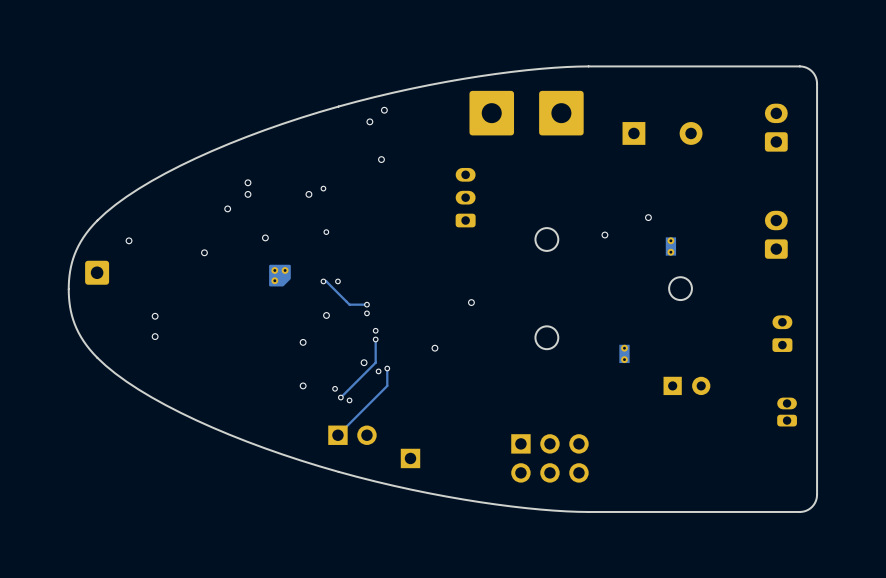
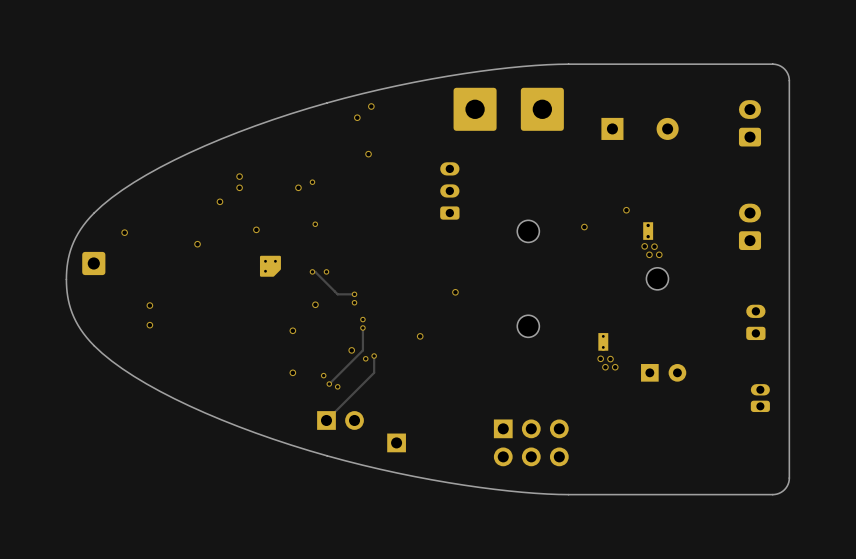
part footprint: [665, 237, 677, 256] -> [643, 222, 654, 240]
via: none -> (644, 246)
via: none -> (654, 246)
via: none -> (649, 254)
via: none -> (659, 254)
via: none -> (600, 358)
via: none -> (610, 359)
via: none -> (605, 367)
via: none -> (615, 367)

